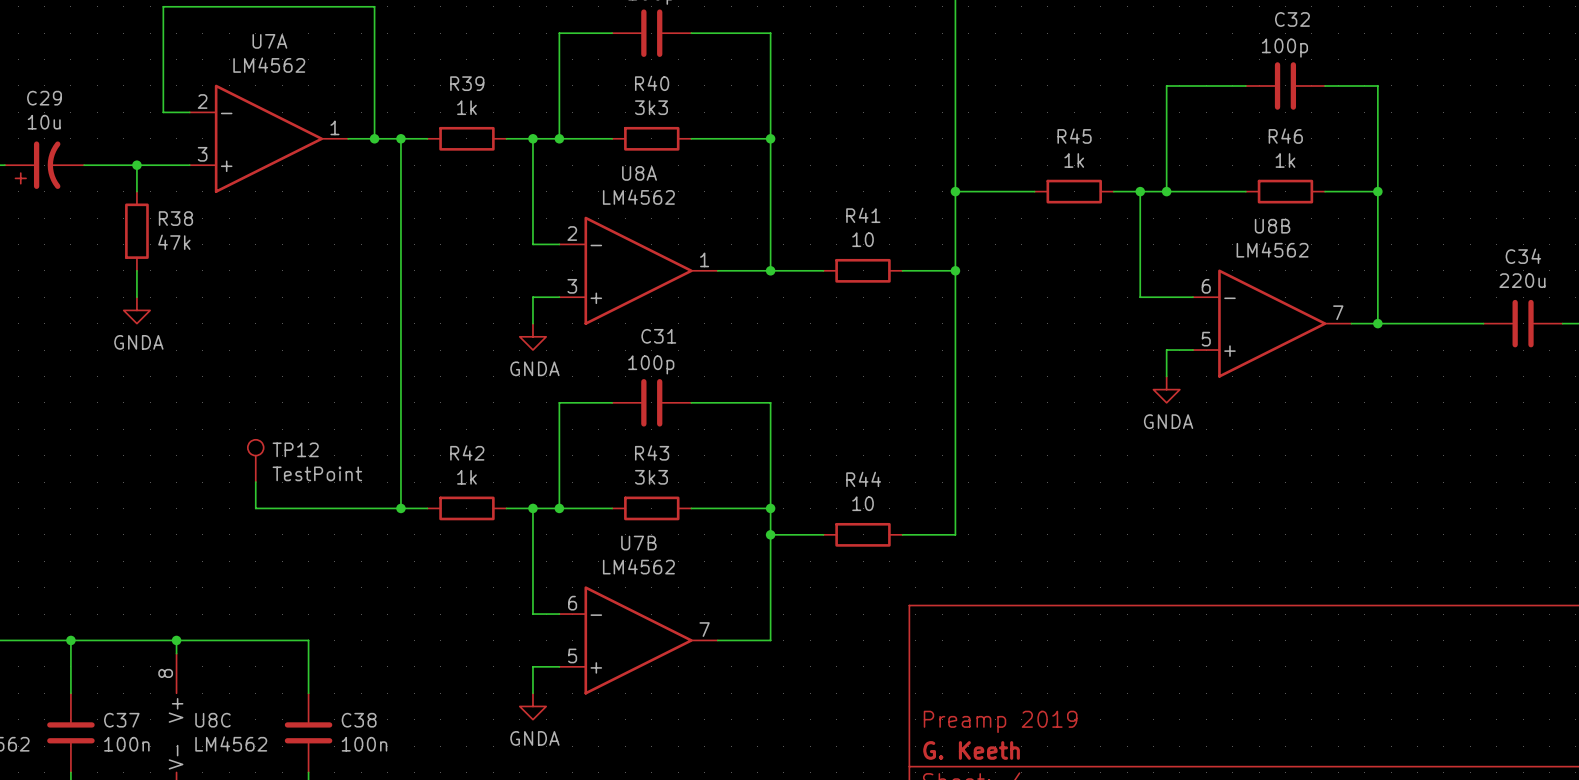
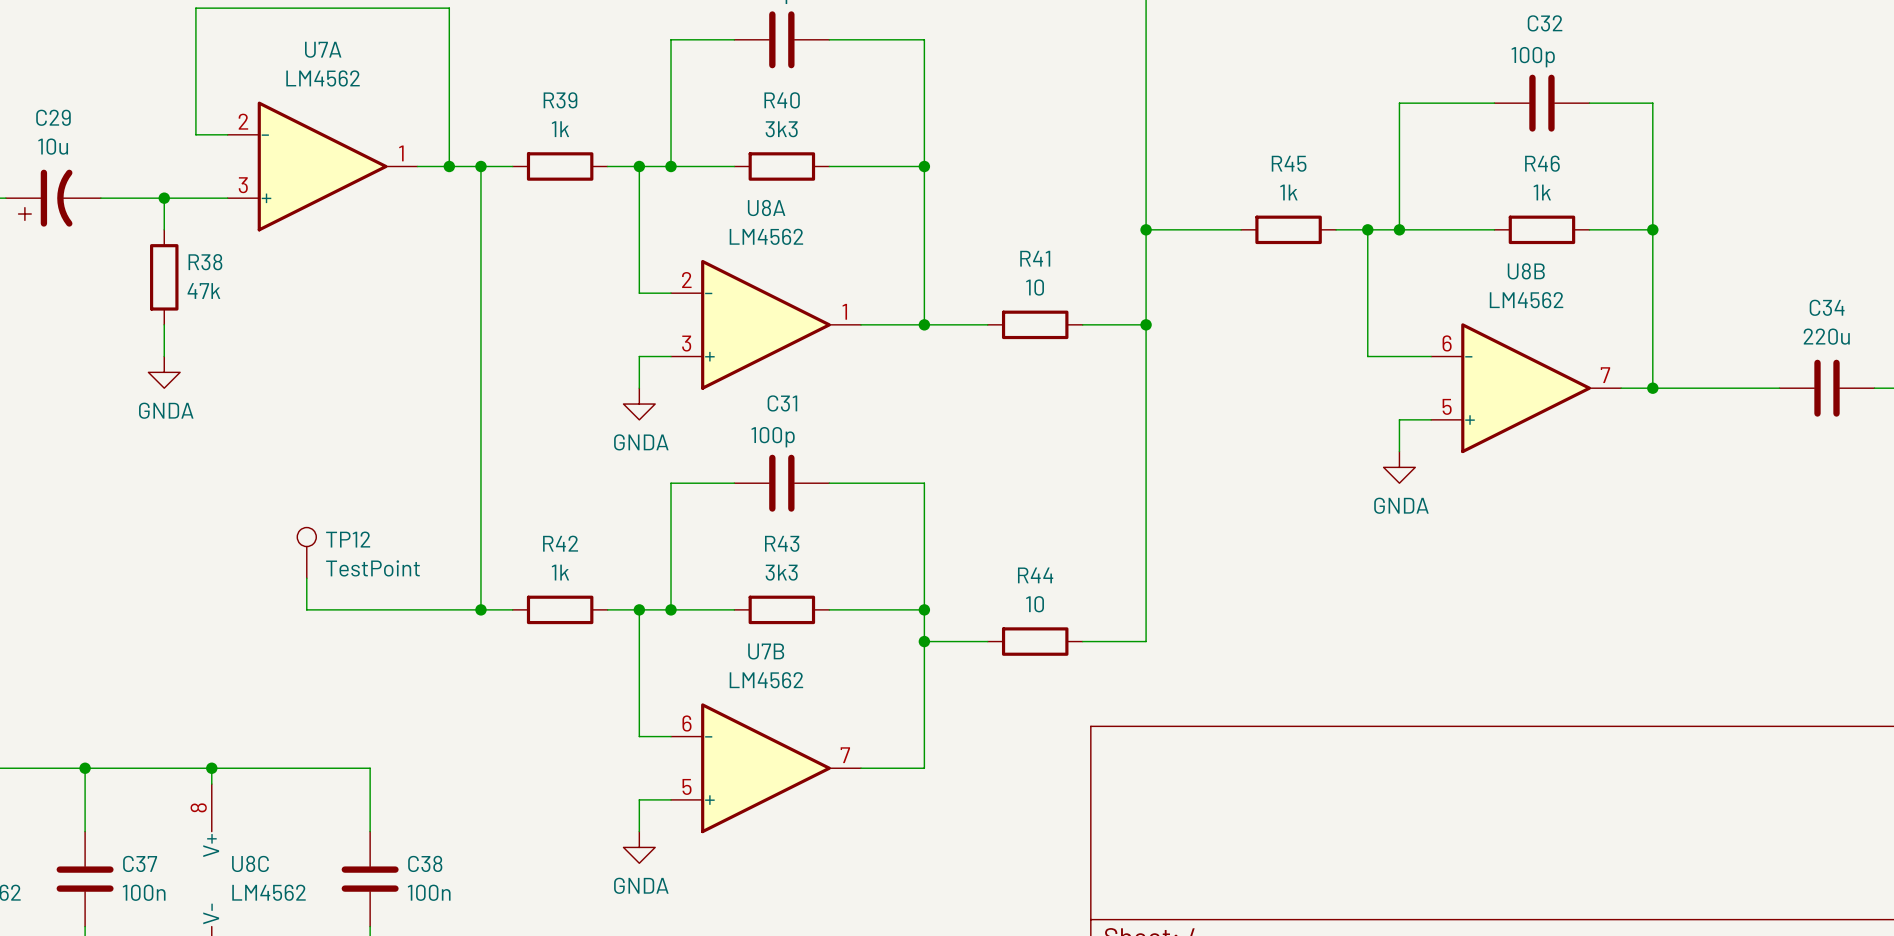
title block: Preamp 2019 (1000, 721) -> none
title block: G. Keeth (971, 750) -> none

